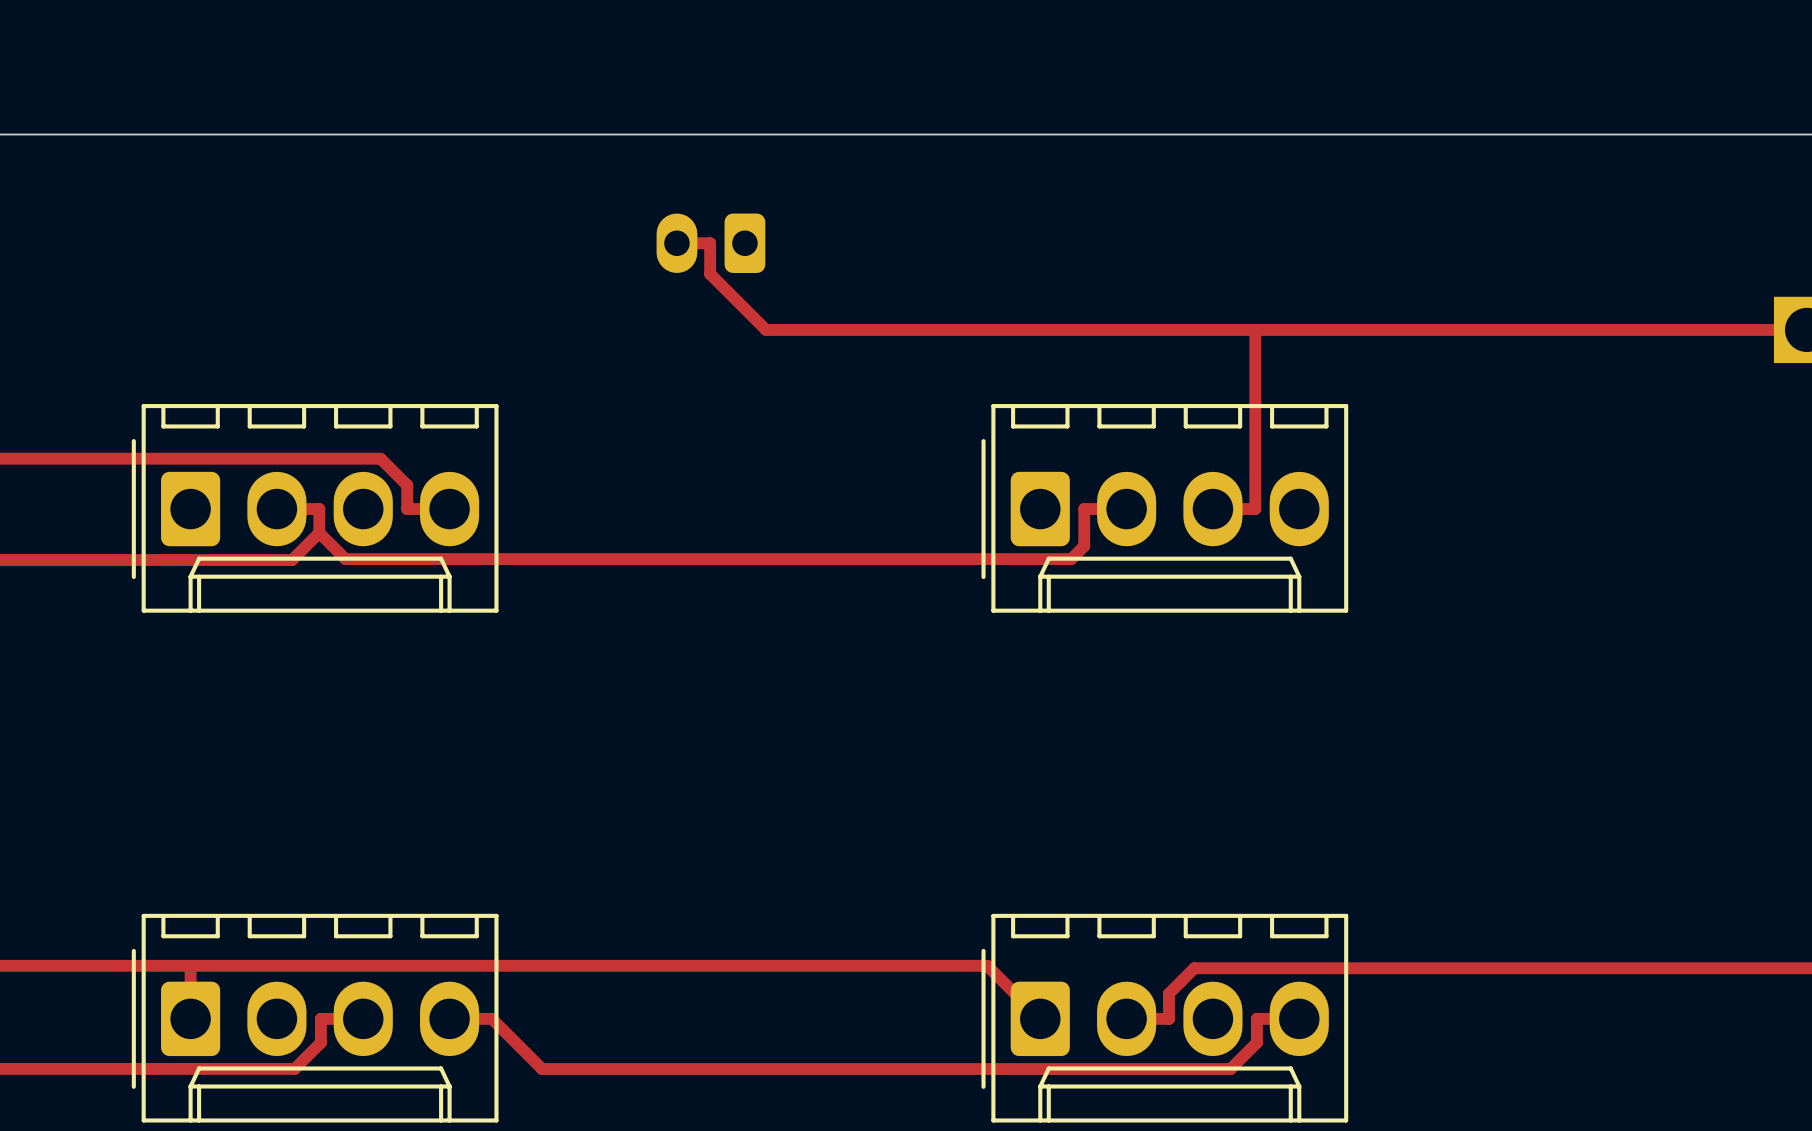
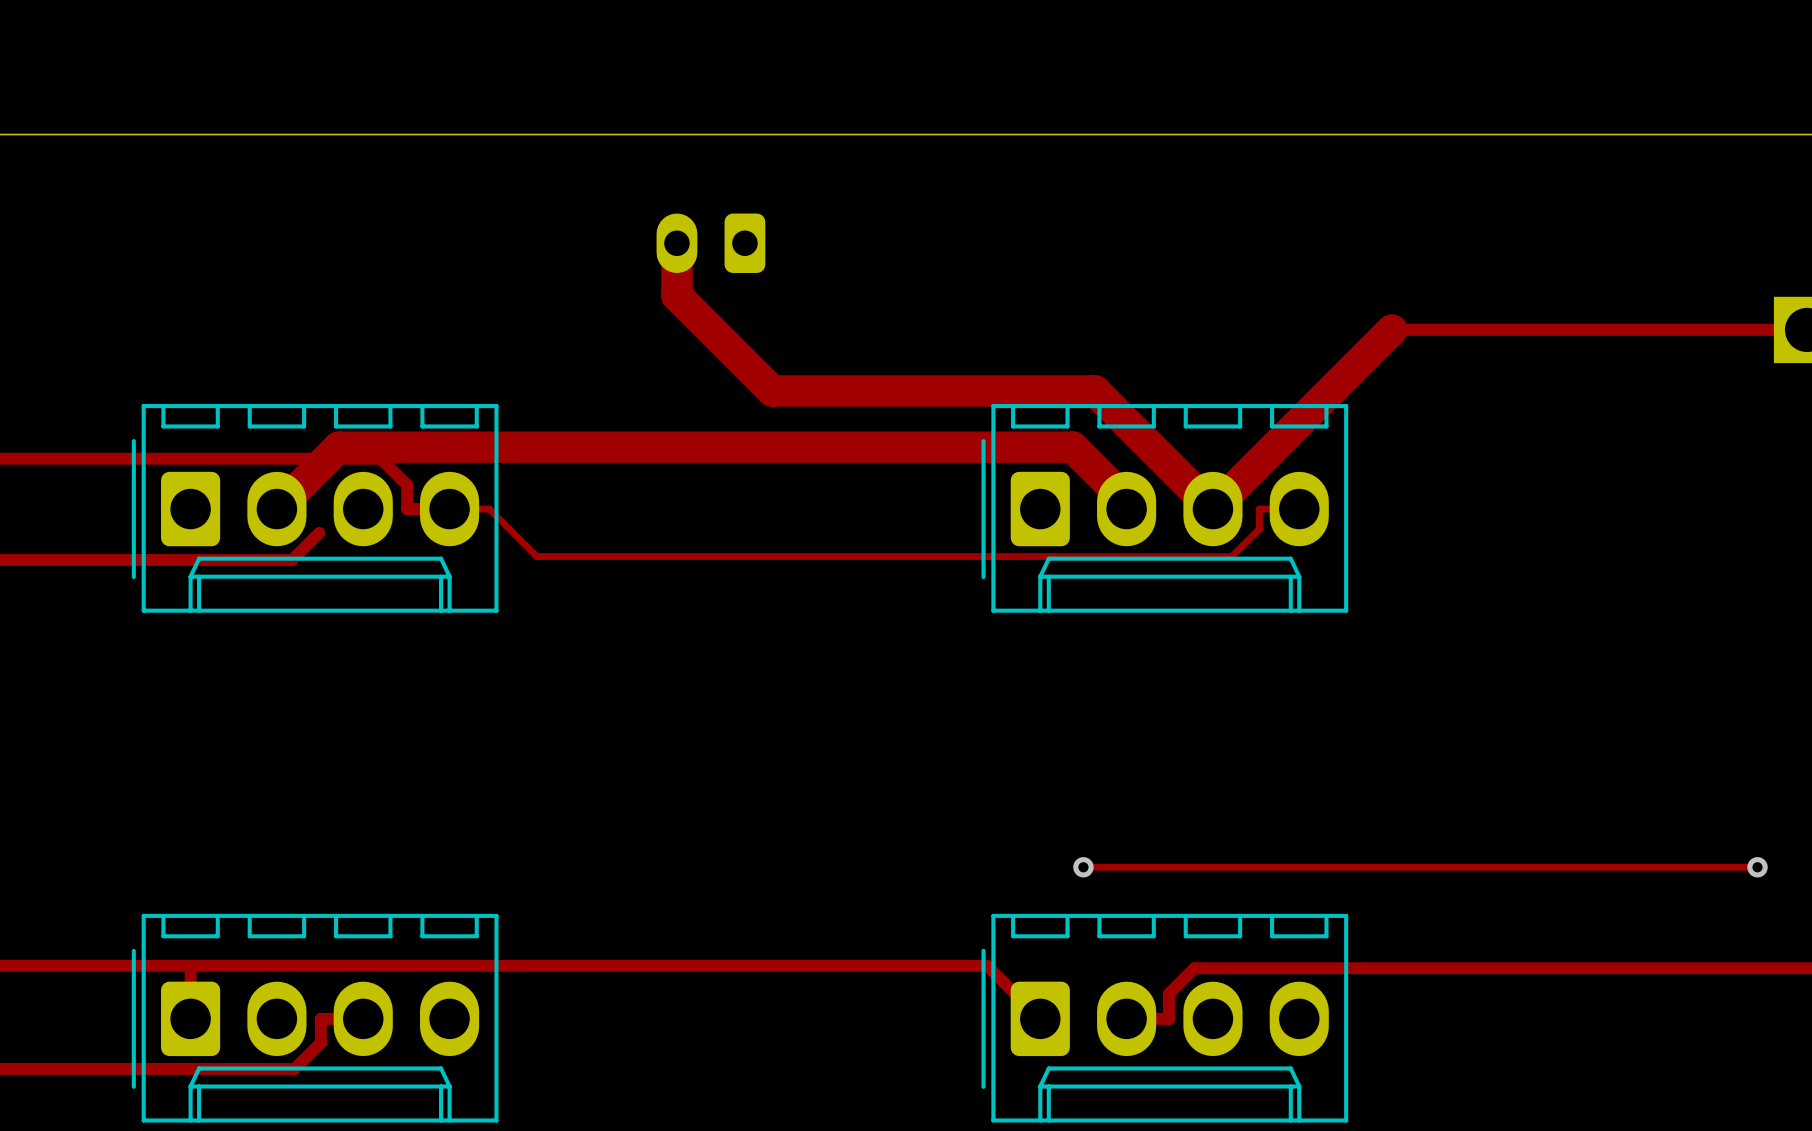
track: (676, 243) (710, 243) (710, 273) (766, 329) (1392, 329) -> (676, 243) (676, 295) (772, 390) (1094, 390) (1212, 509) (1392, 329)
track: (1255, 329) (1255, 509) (1212, 509) -> none
track: (276, 509) (319, 509) (319, 532) (345, 559) (1071, 559) (1084, 546) (1084, 509) (1126, 509) -> (276, 509) (338, 447) (1072, 447) (1126, 500) (1126, 509)
track: none -> (449, 509) (489, 509) (536, 556) (1231, 556) (1259, 528) (1259, 509) (1299, 509)
track: none -> (1083, 867) (1757, 867)
via: none -> (1083, 867)
via: none -> (1757, 867)
track: (449, 1018) (491, 1018) (542, 1069) (1230, 1069) (1256, 1042) (1256, 1018) (1299, 1018) -> none

